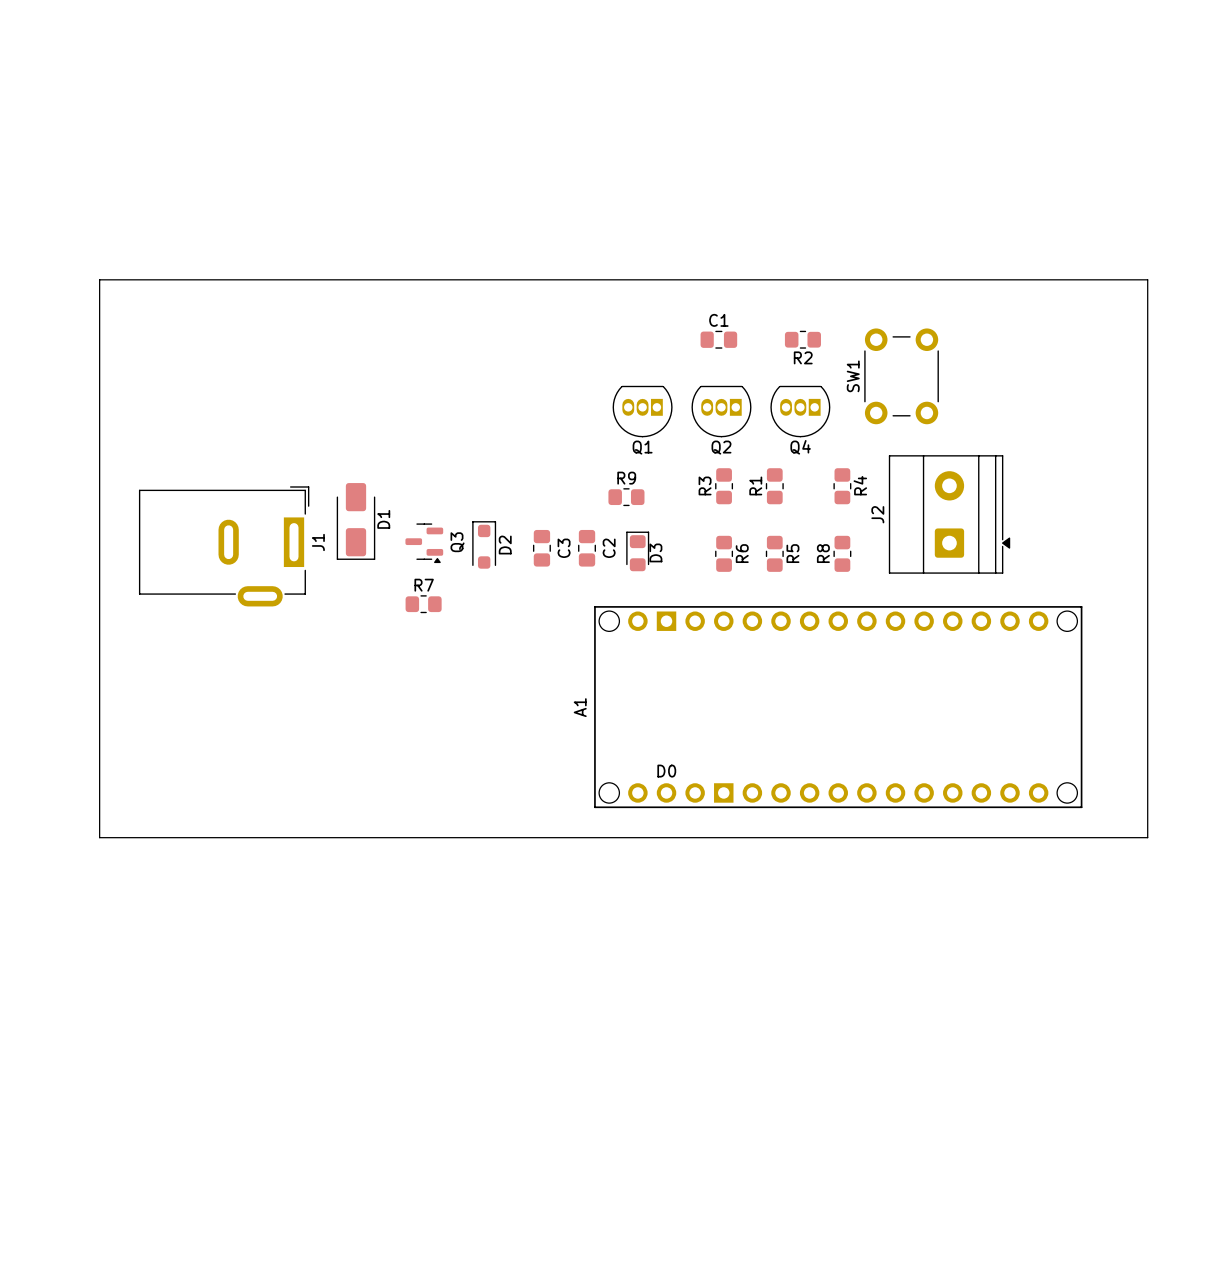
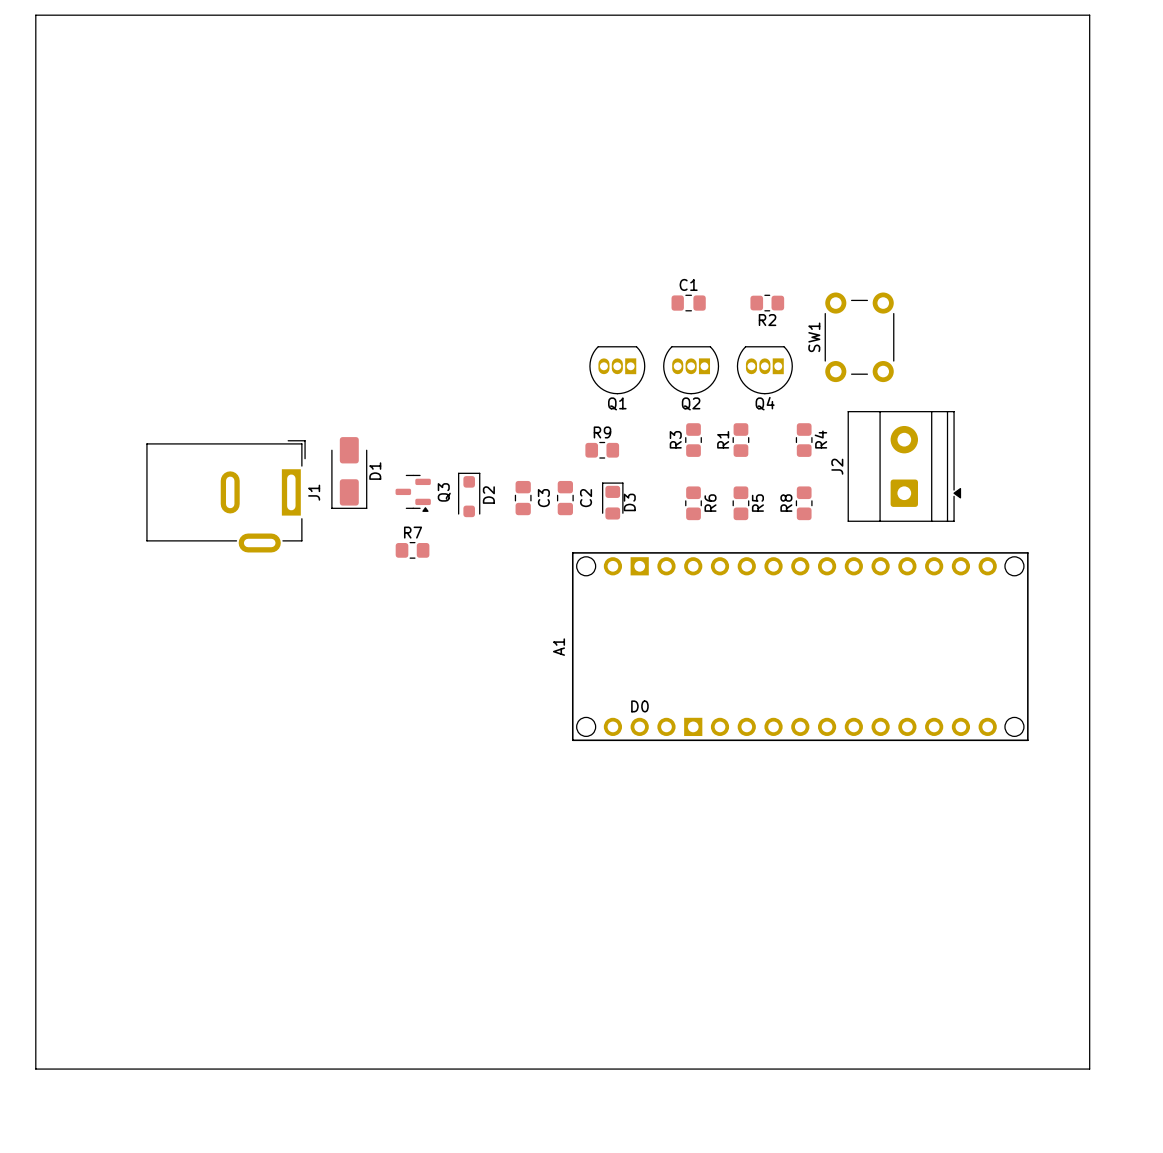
board edge: (1147, 279) (99, 279) (99, 837) (1147, 837) -> (1089, 247) (1089, 15) (35, 15) (35, 1069) (1089, 1069) (1089, 768)

